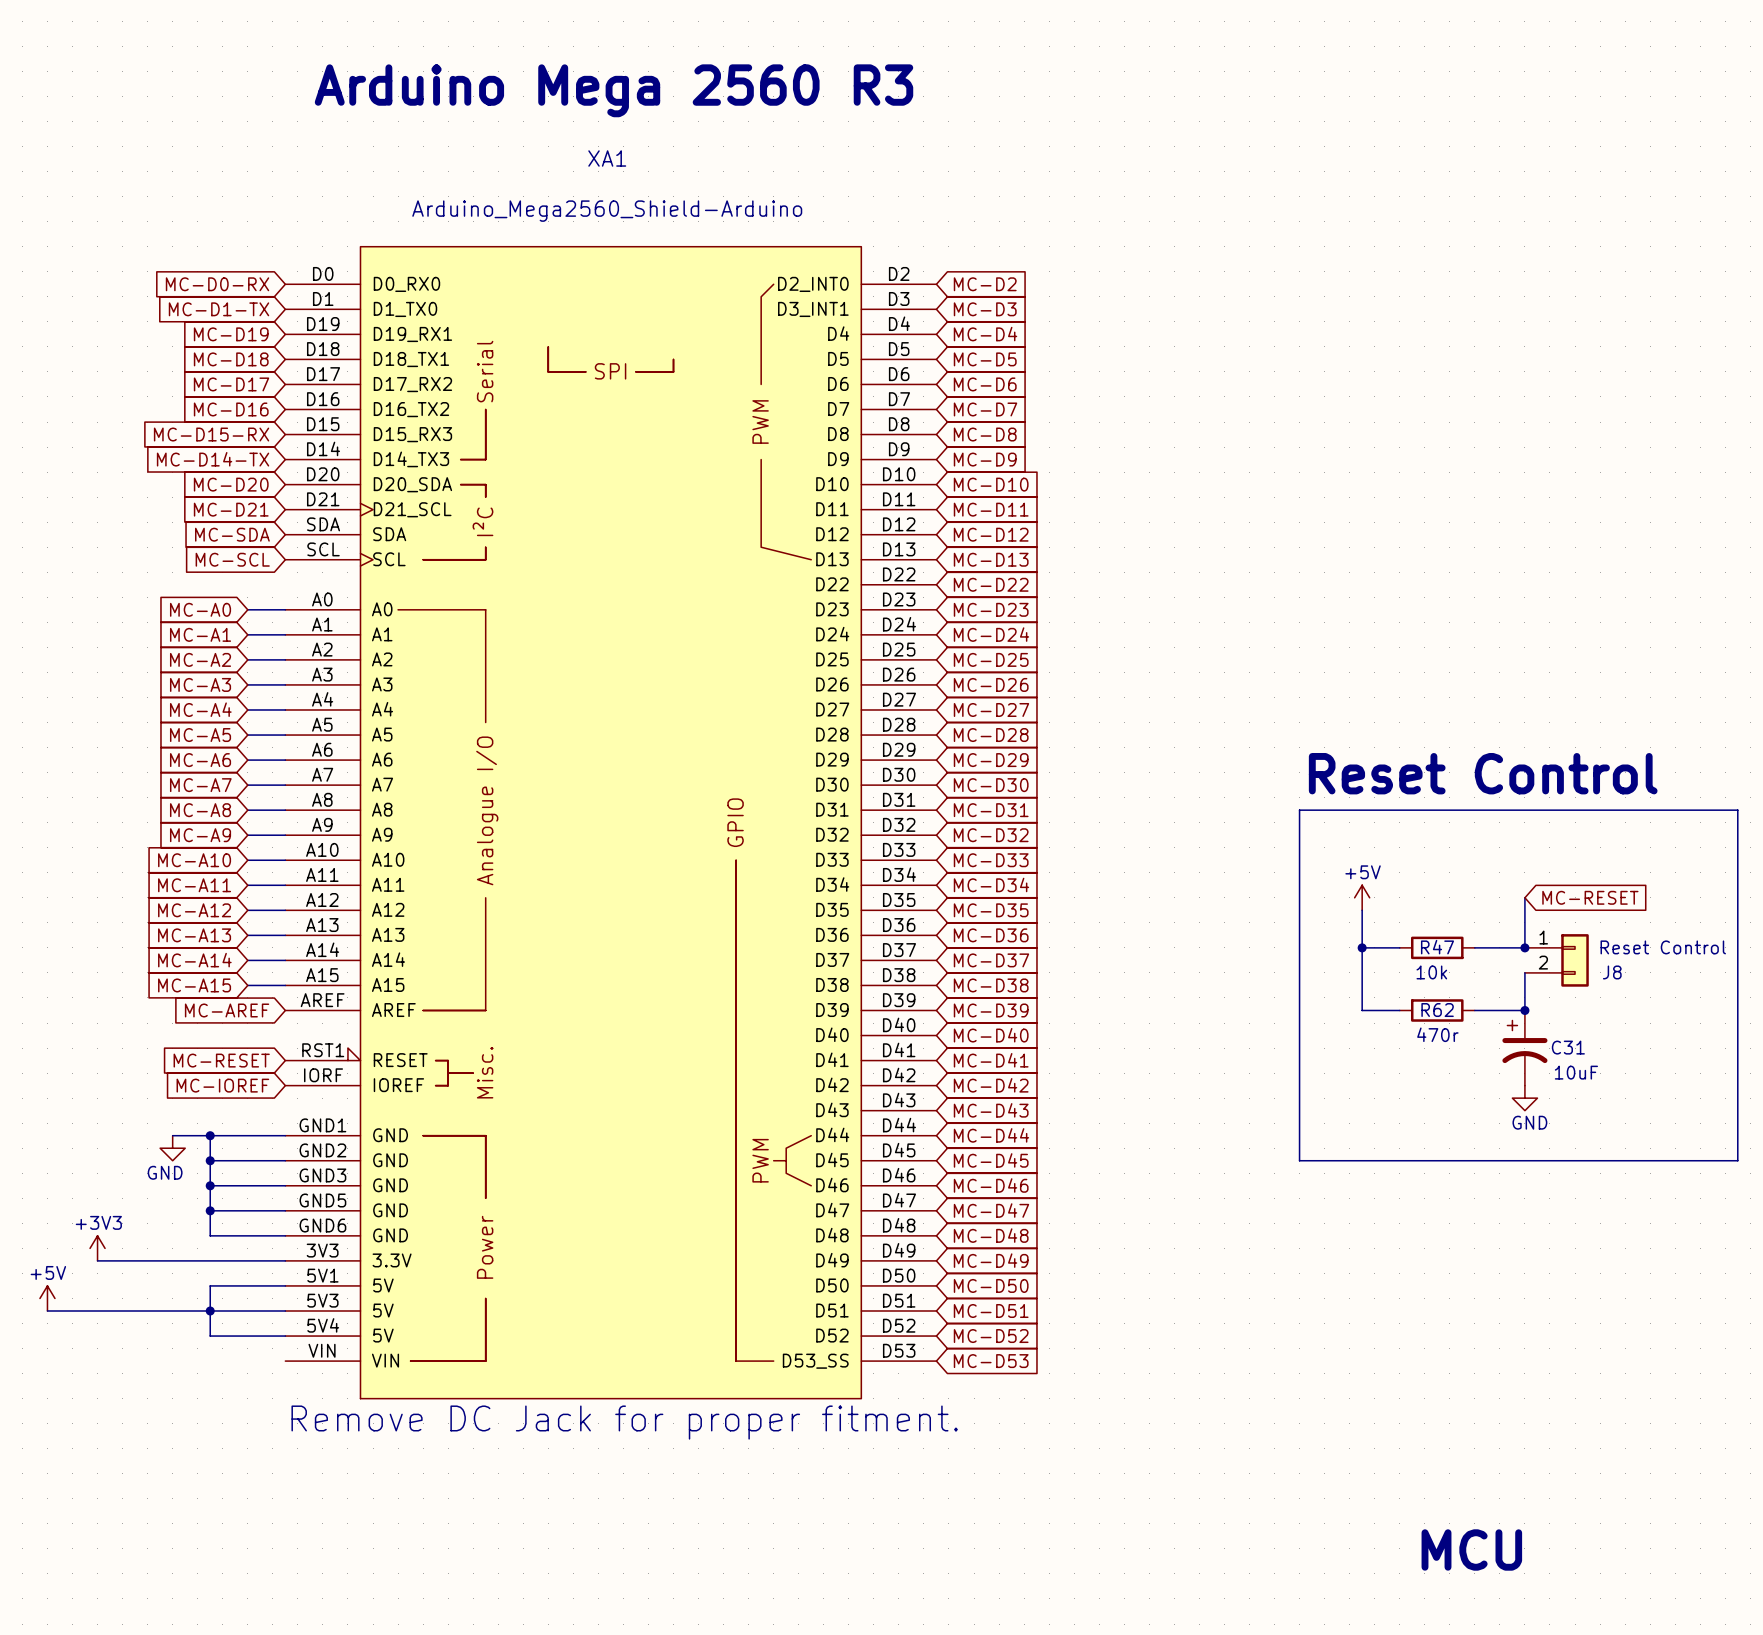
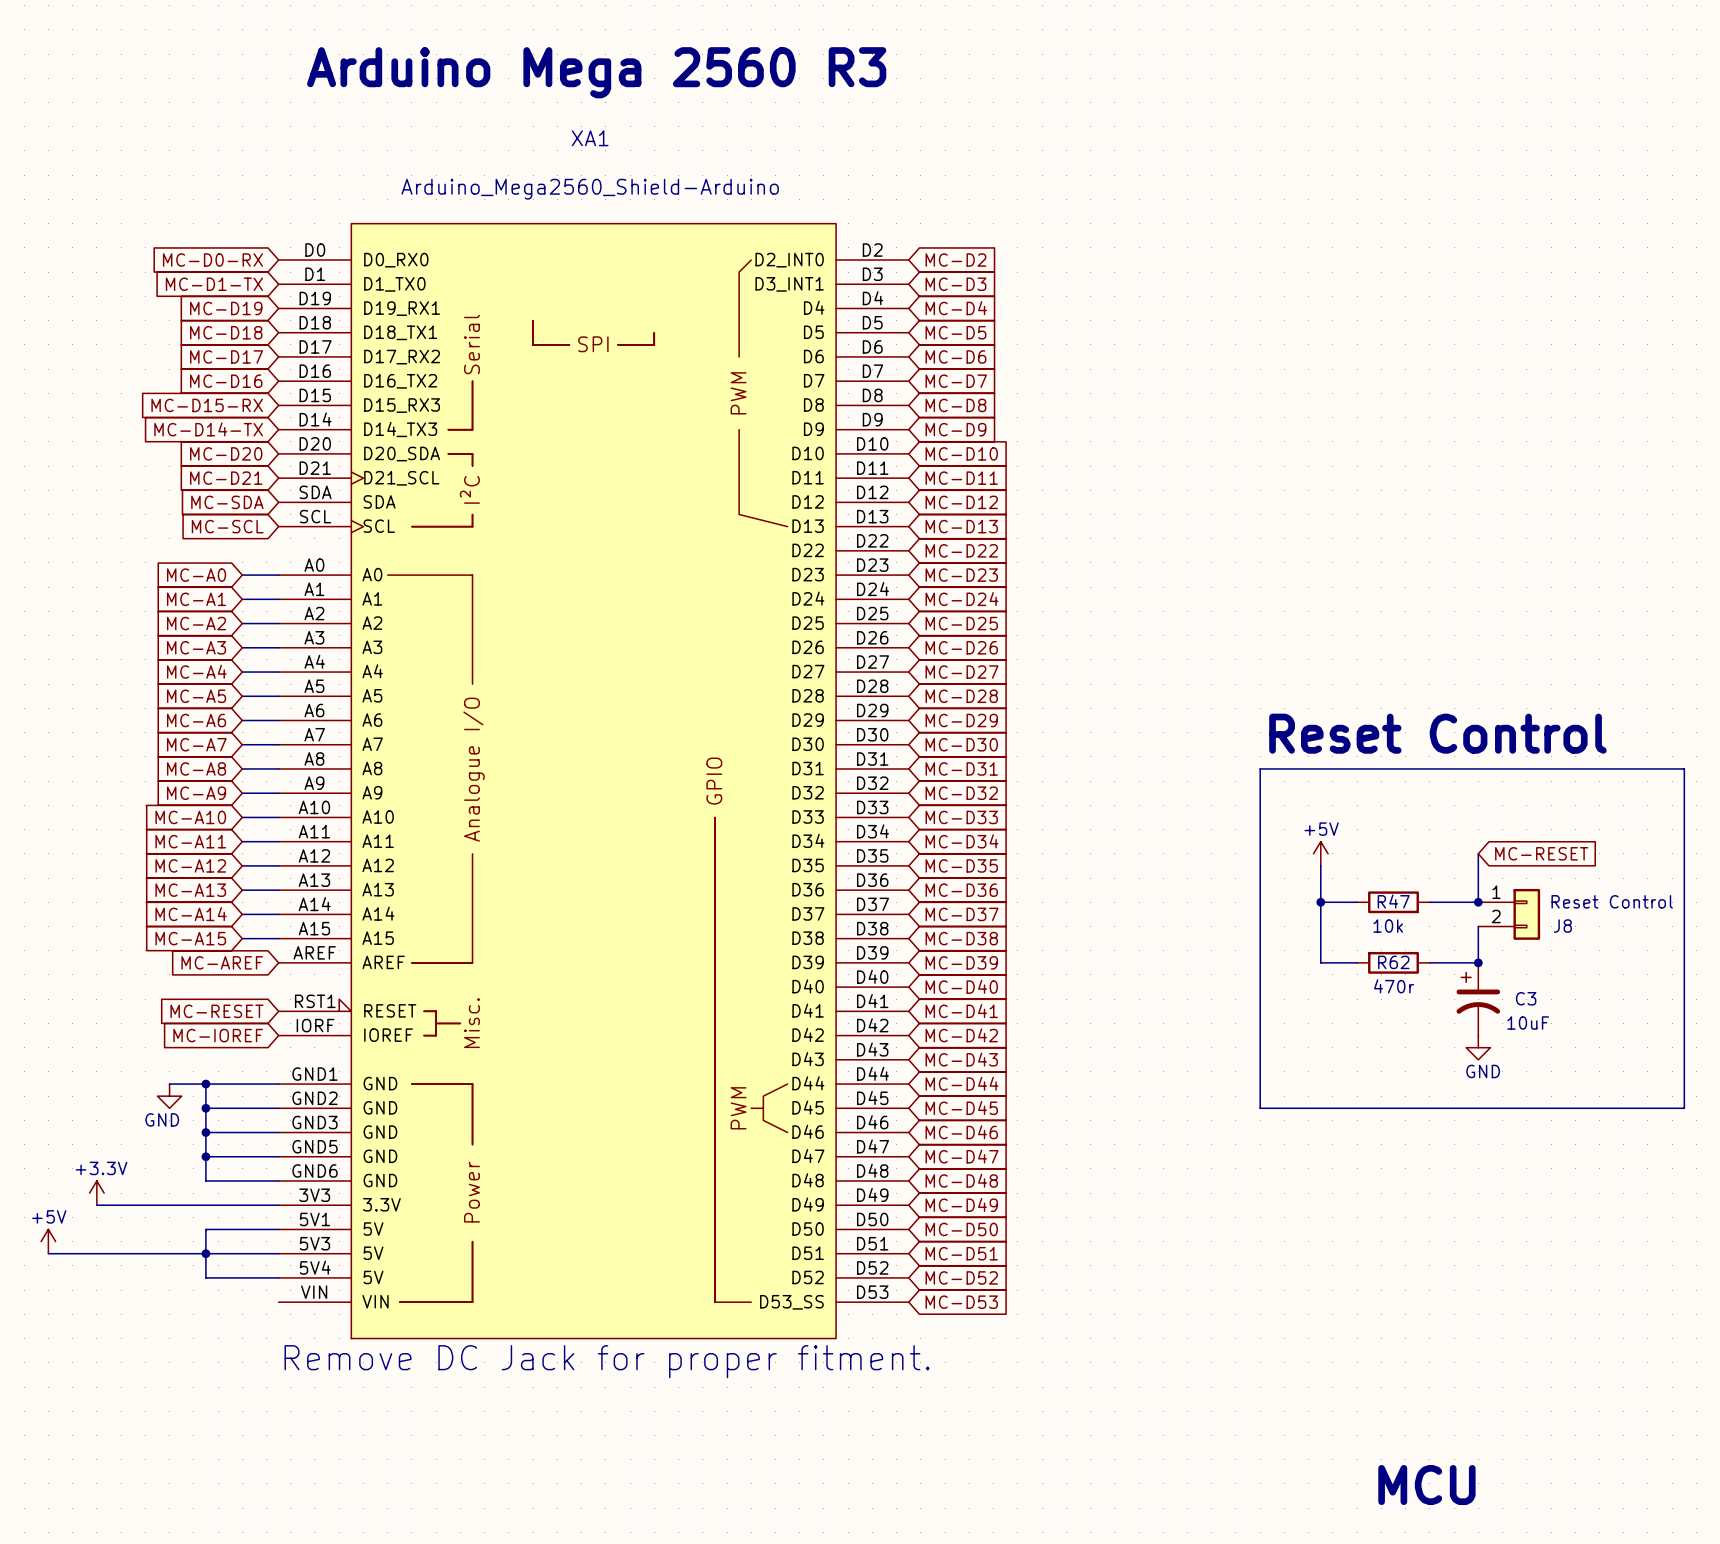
C31 name: C31 (1568, 1047) -> C3 (1526, 998)
power symbol: +3V3 (97, 1248) -> +3.3V (96, 1193)

